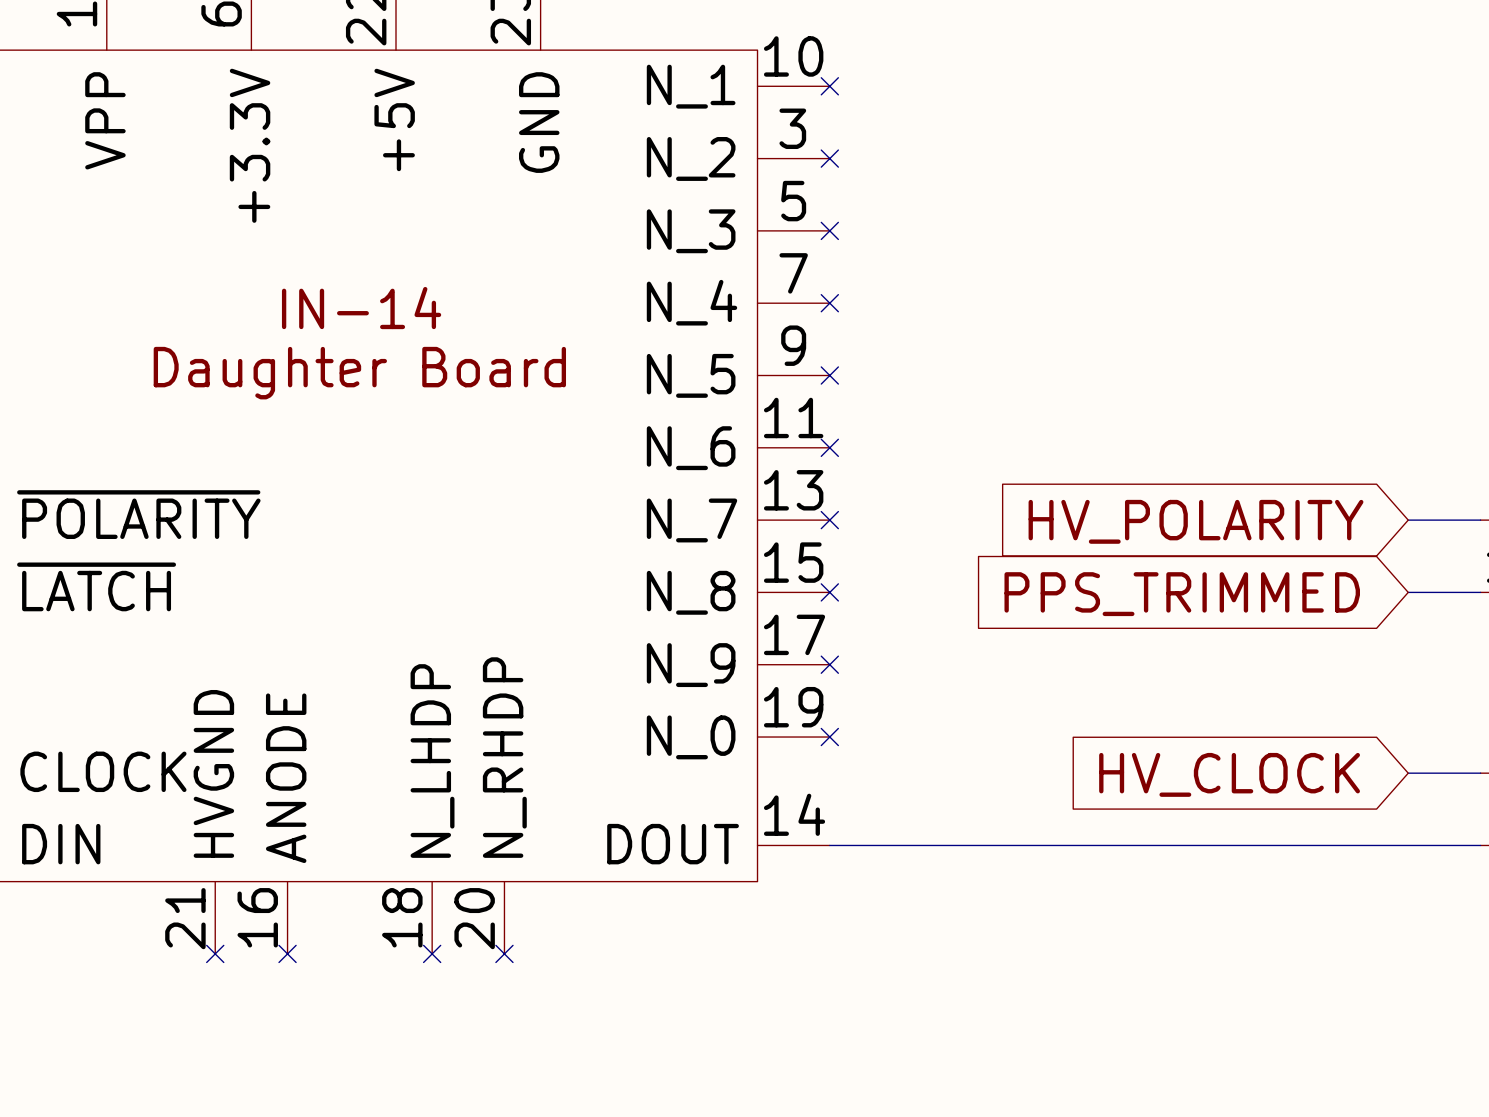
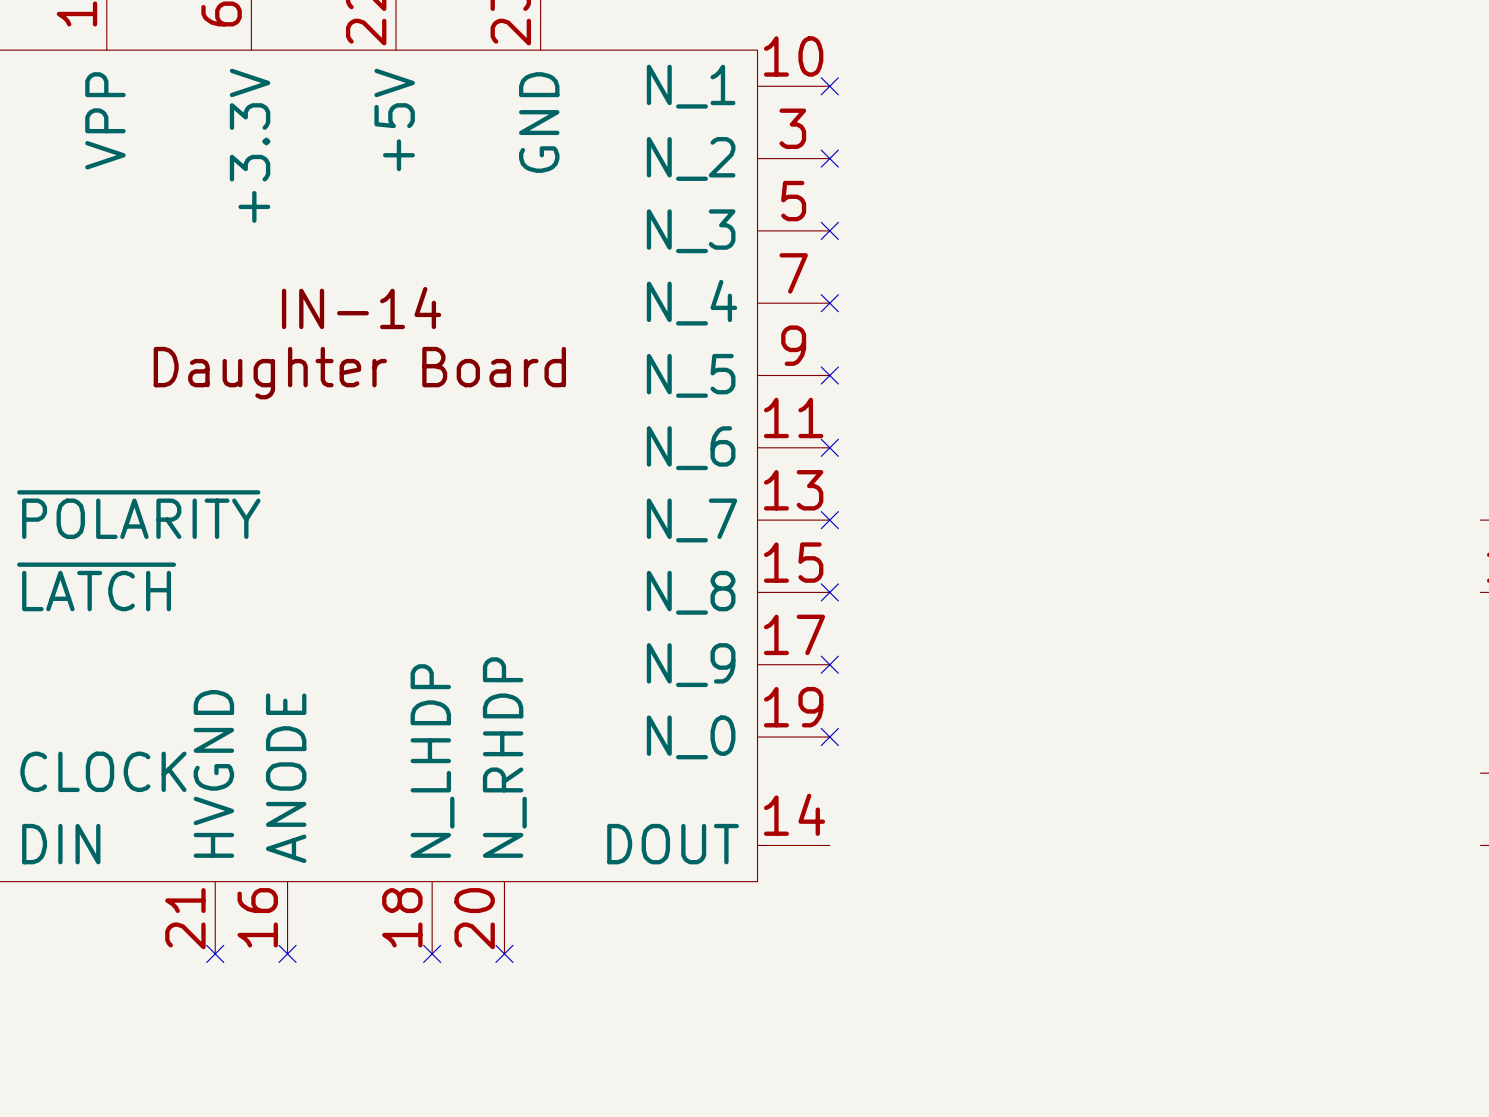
wire: (1408, 520) (1480, 520) -> none
global label: HV_POLARITY (1196, 521) -> none
wire: (1408, 592) (1480, 592) -> none
global label: PPS_TRIMMED (1182, 594) -> none
wire: (1408, 773) (1480, 773) -> none
global label: HV_CLOCK (1229, 774) -> none
wire: (829, 845) (1480, 845) -> none

